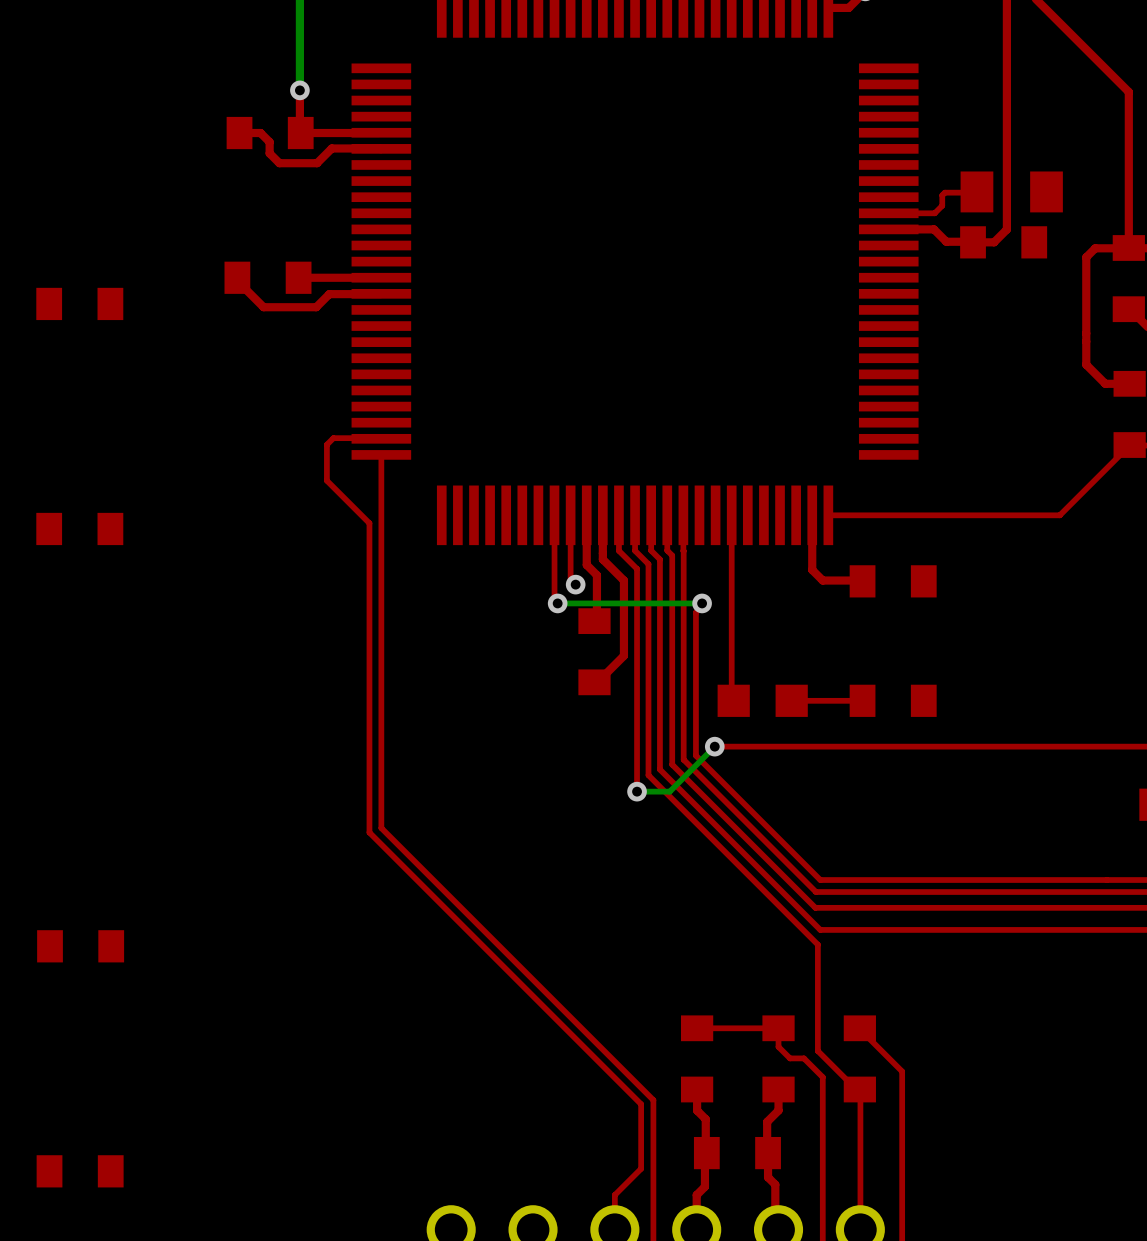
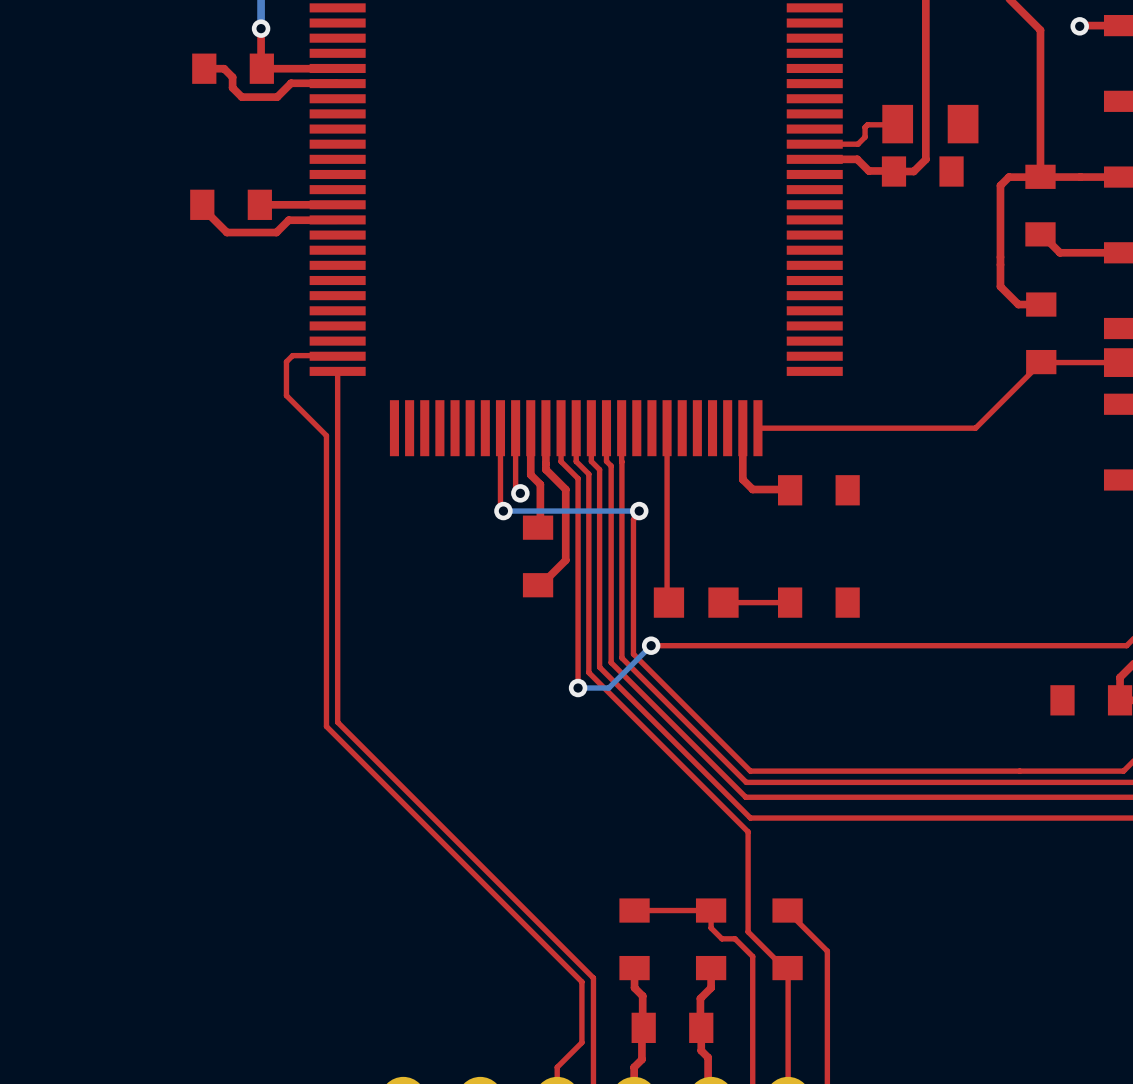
part: (79, 303) -> none
part: (79, 528) -> none
part: (80, 946) -> none
part: (80, 1171) -> none

